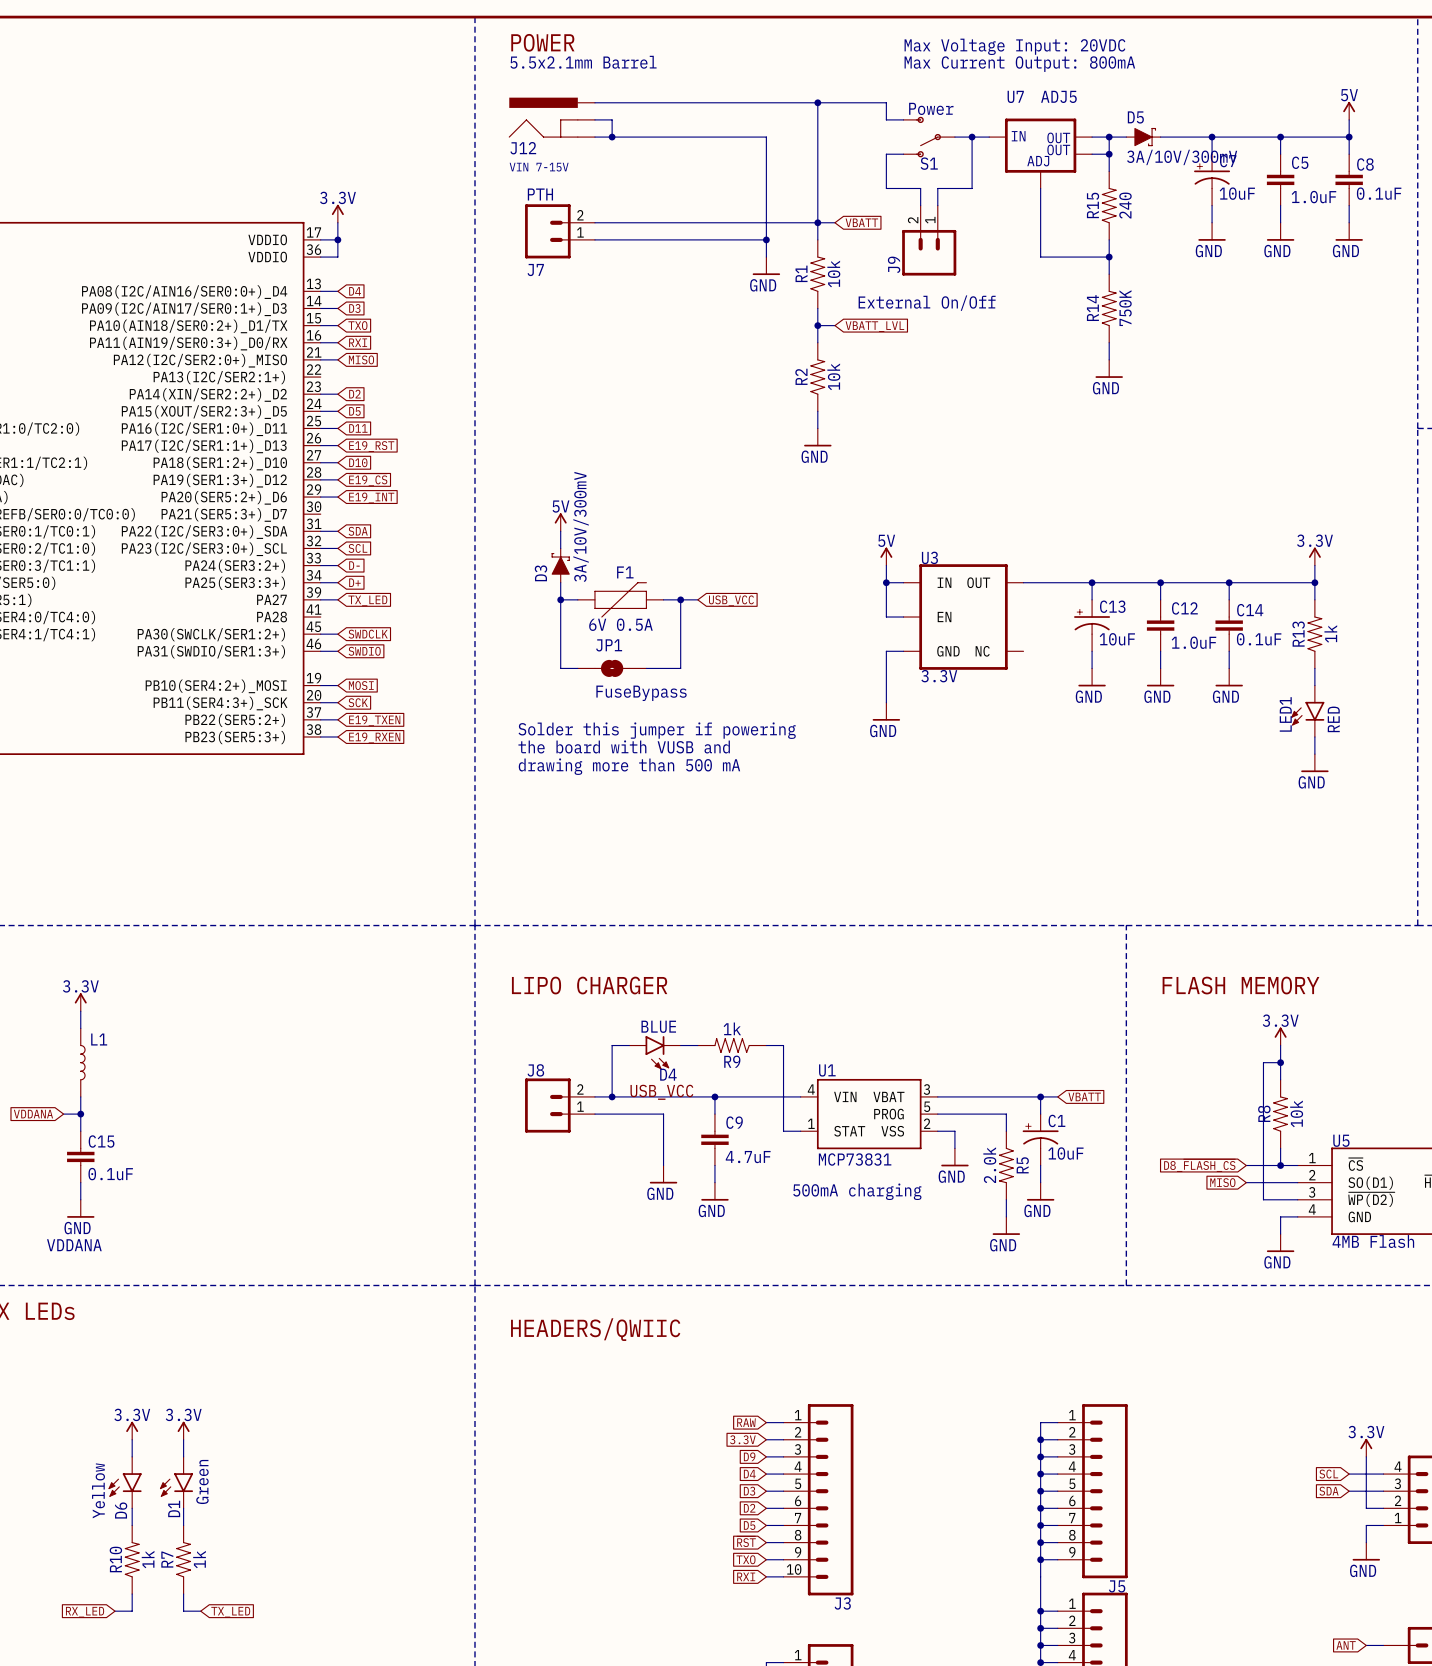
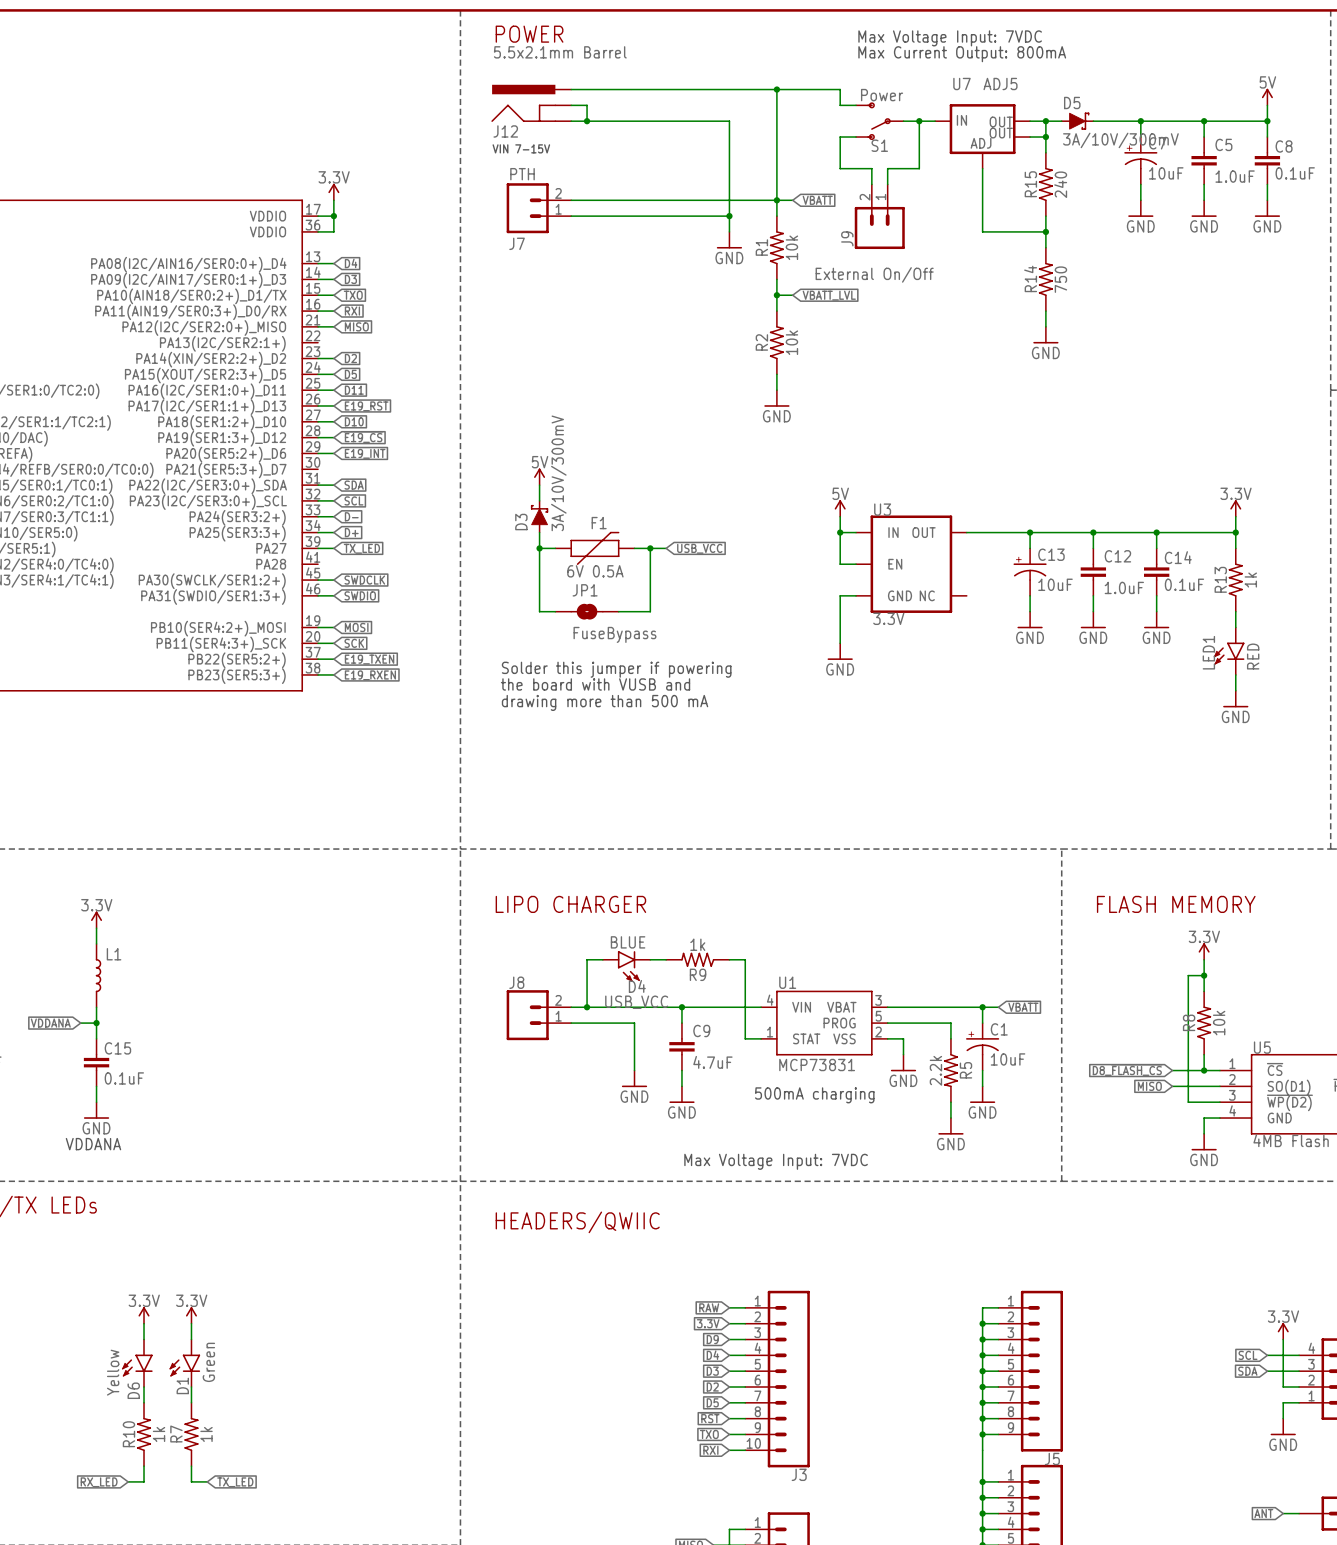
text: Max Voltage Input: 20VDC (1014, 46) -> Max Voltage Input: 7VDC (950, 38)
R14 value: 750K (1125, 308) -> 750 (1060, 279)
R5 value: 2.0k (989, 1165) -> 2.2k (935, 1070)
text: none -> Max Voltage Input: 7VDC (776, 1161)

